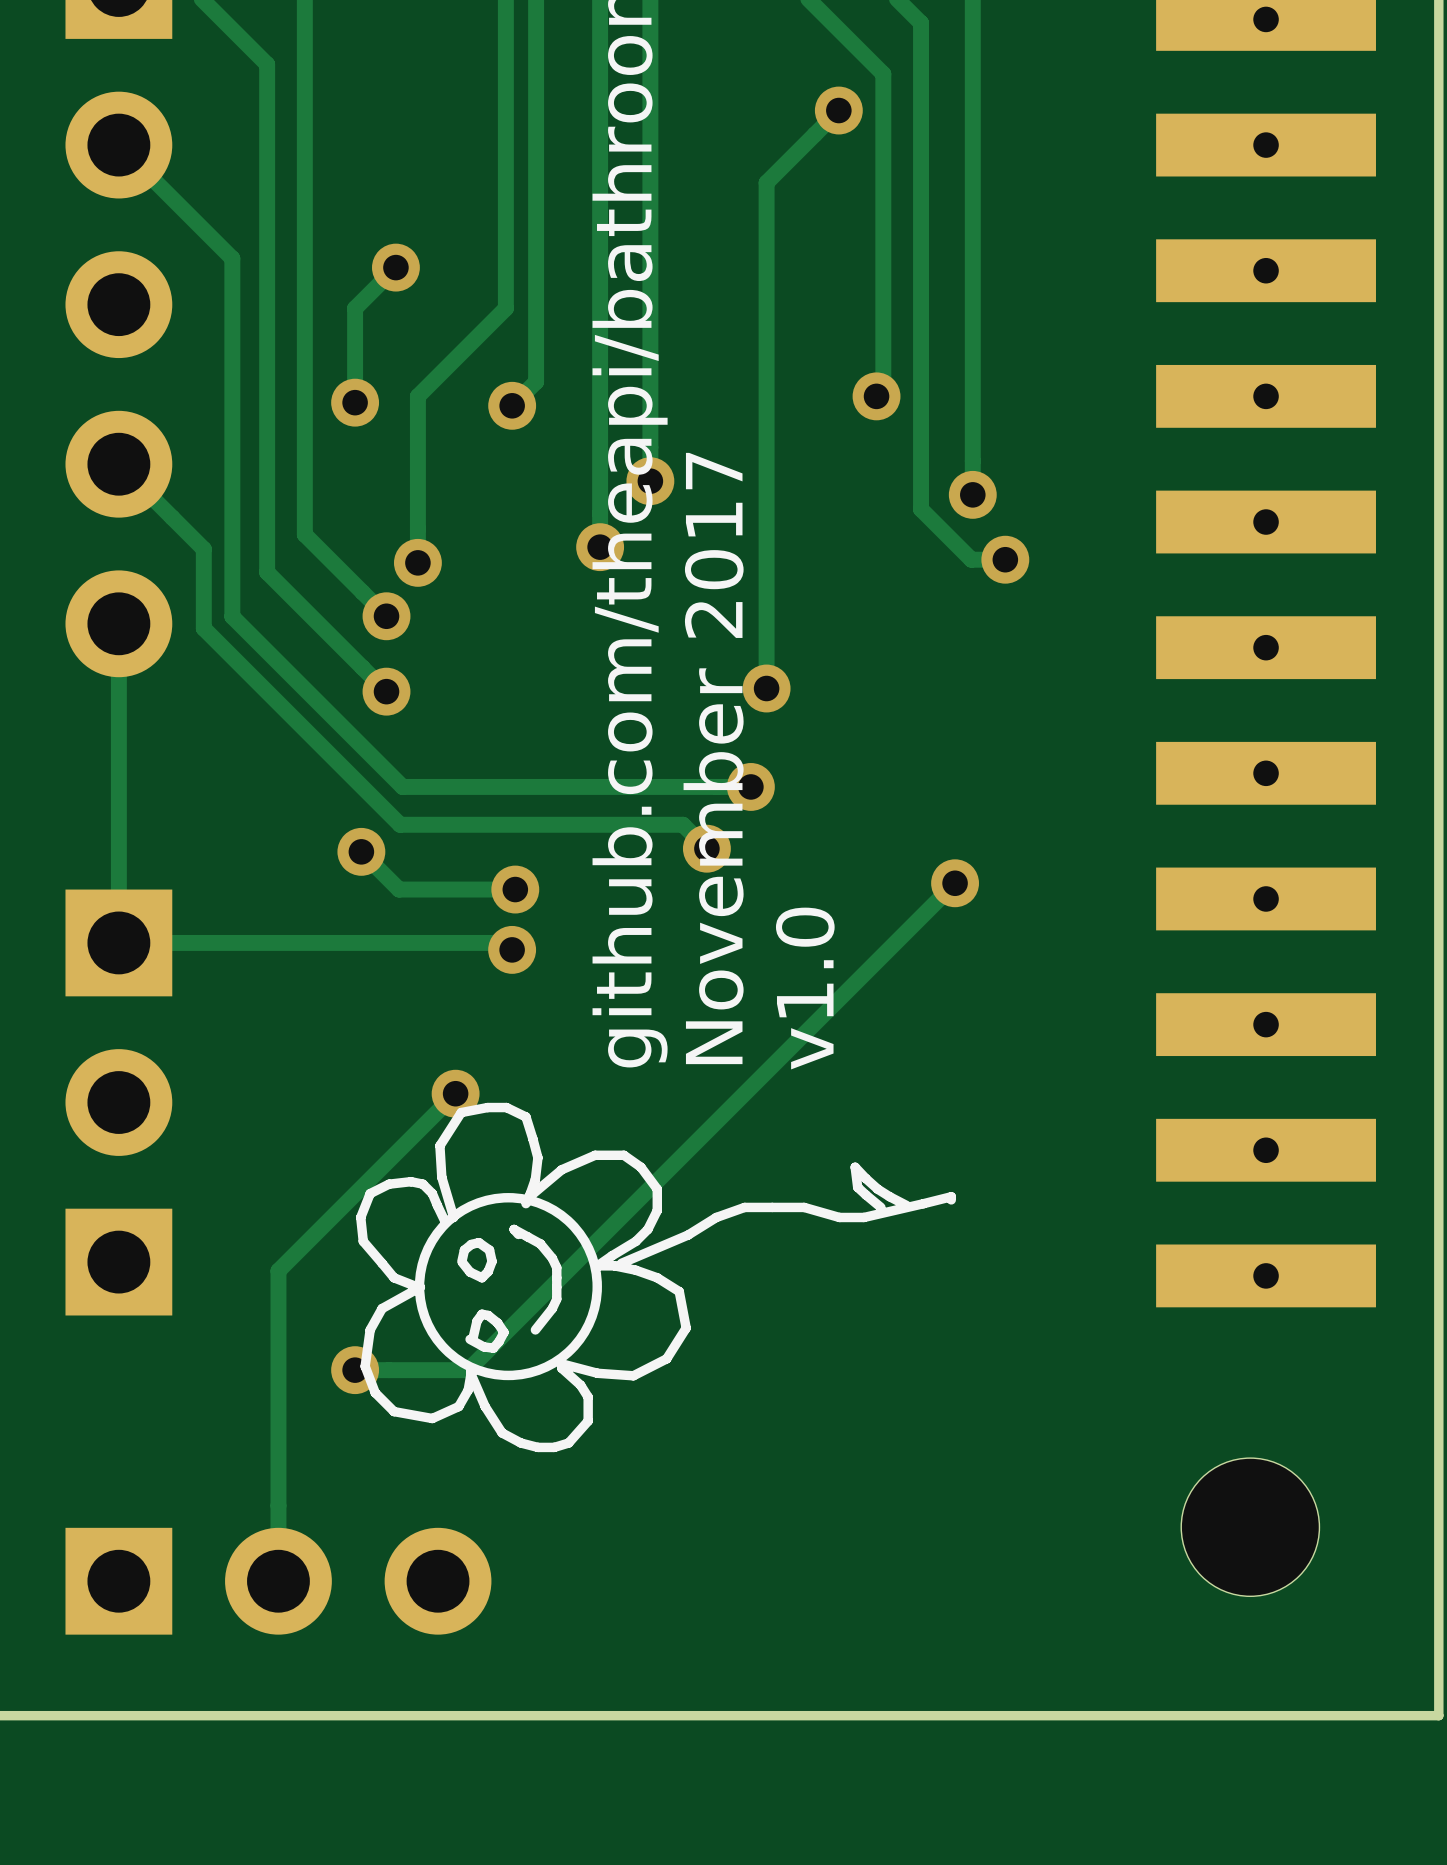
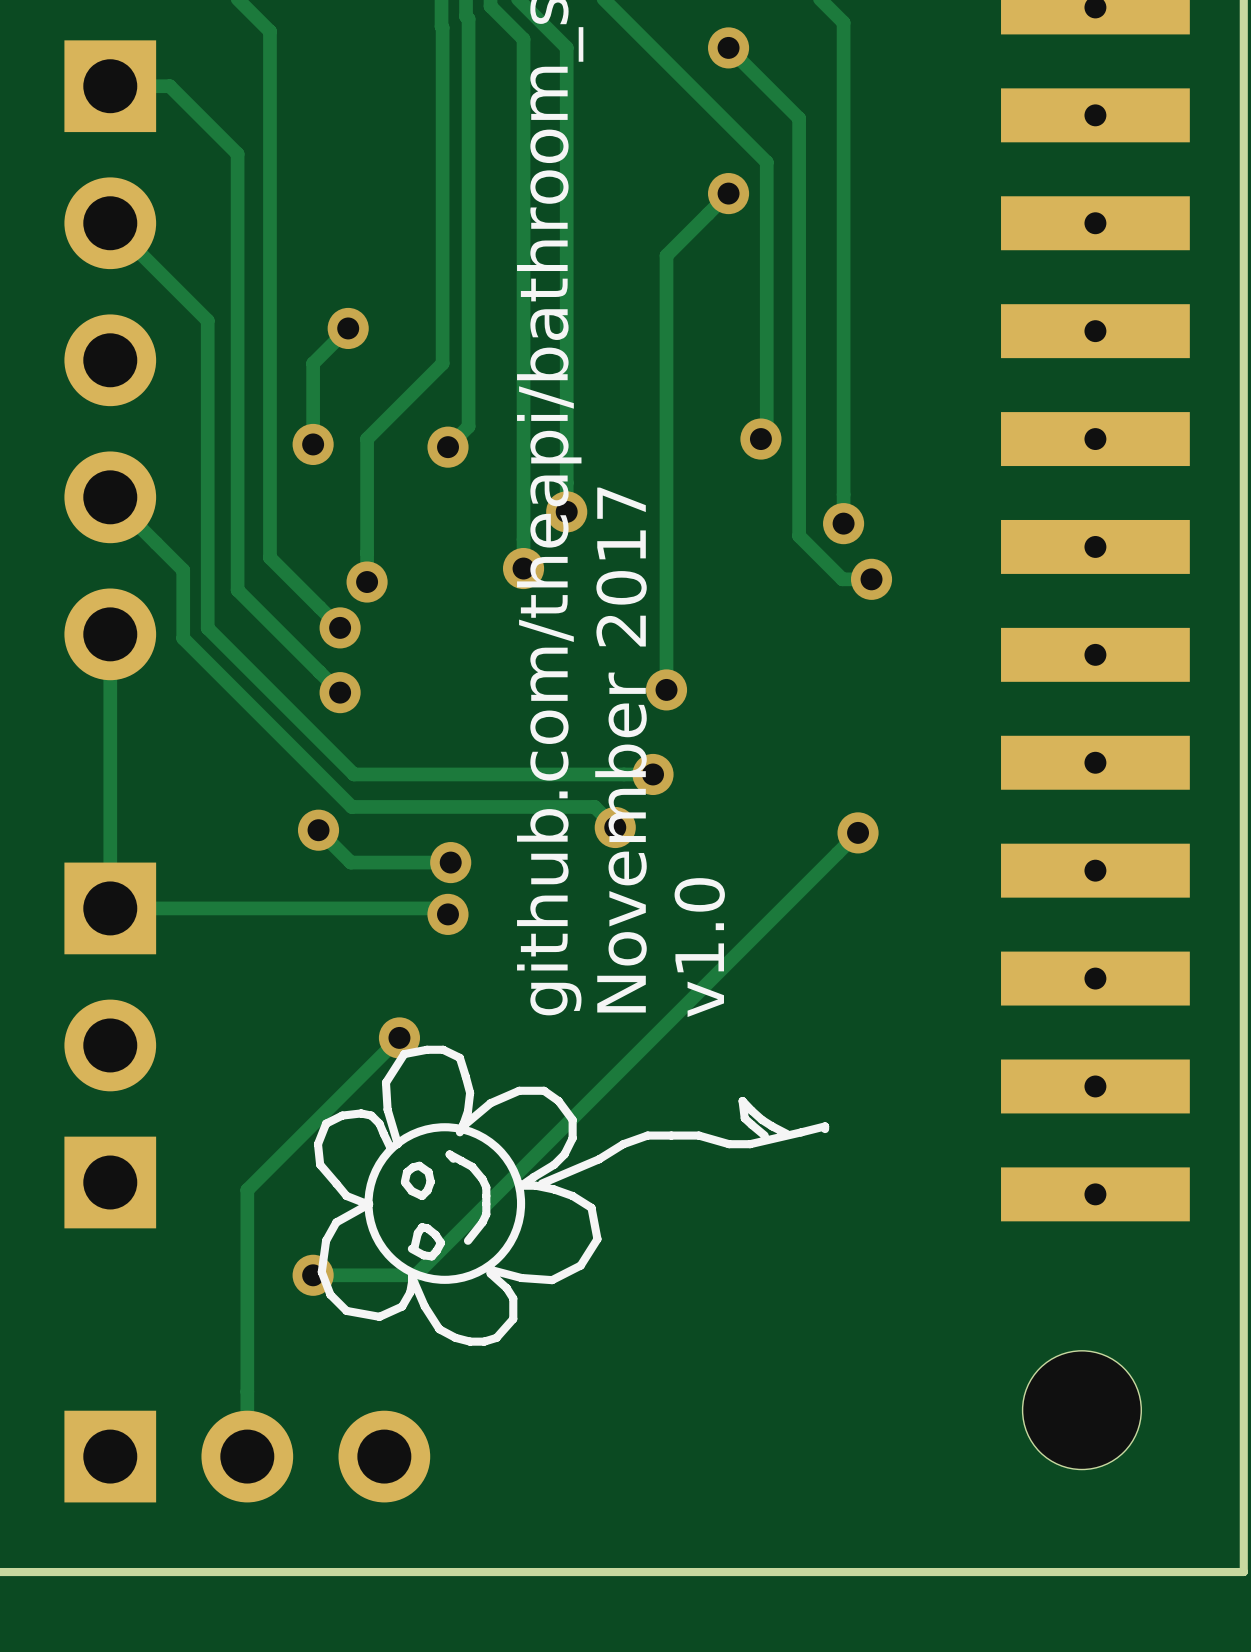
track: (955, 883) (468, 1370) -> (858, 832) (415, 1275) (410, 1275)
via position: (955, 883) -> (858, 832)

